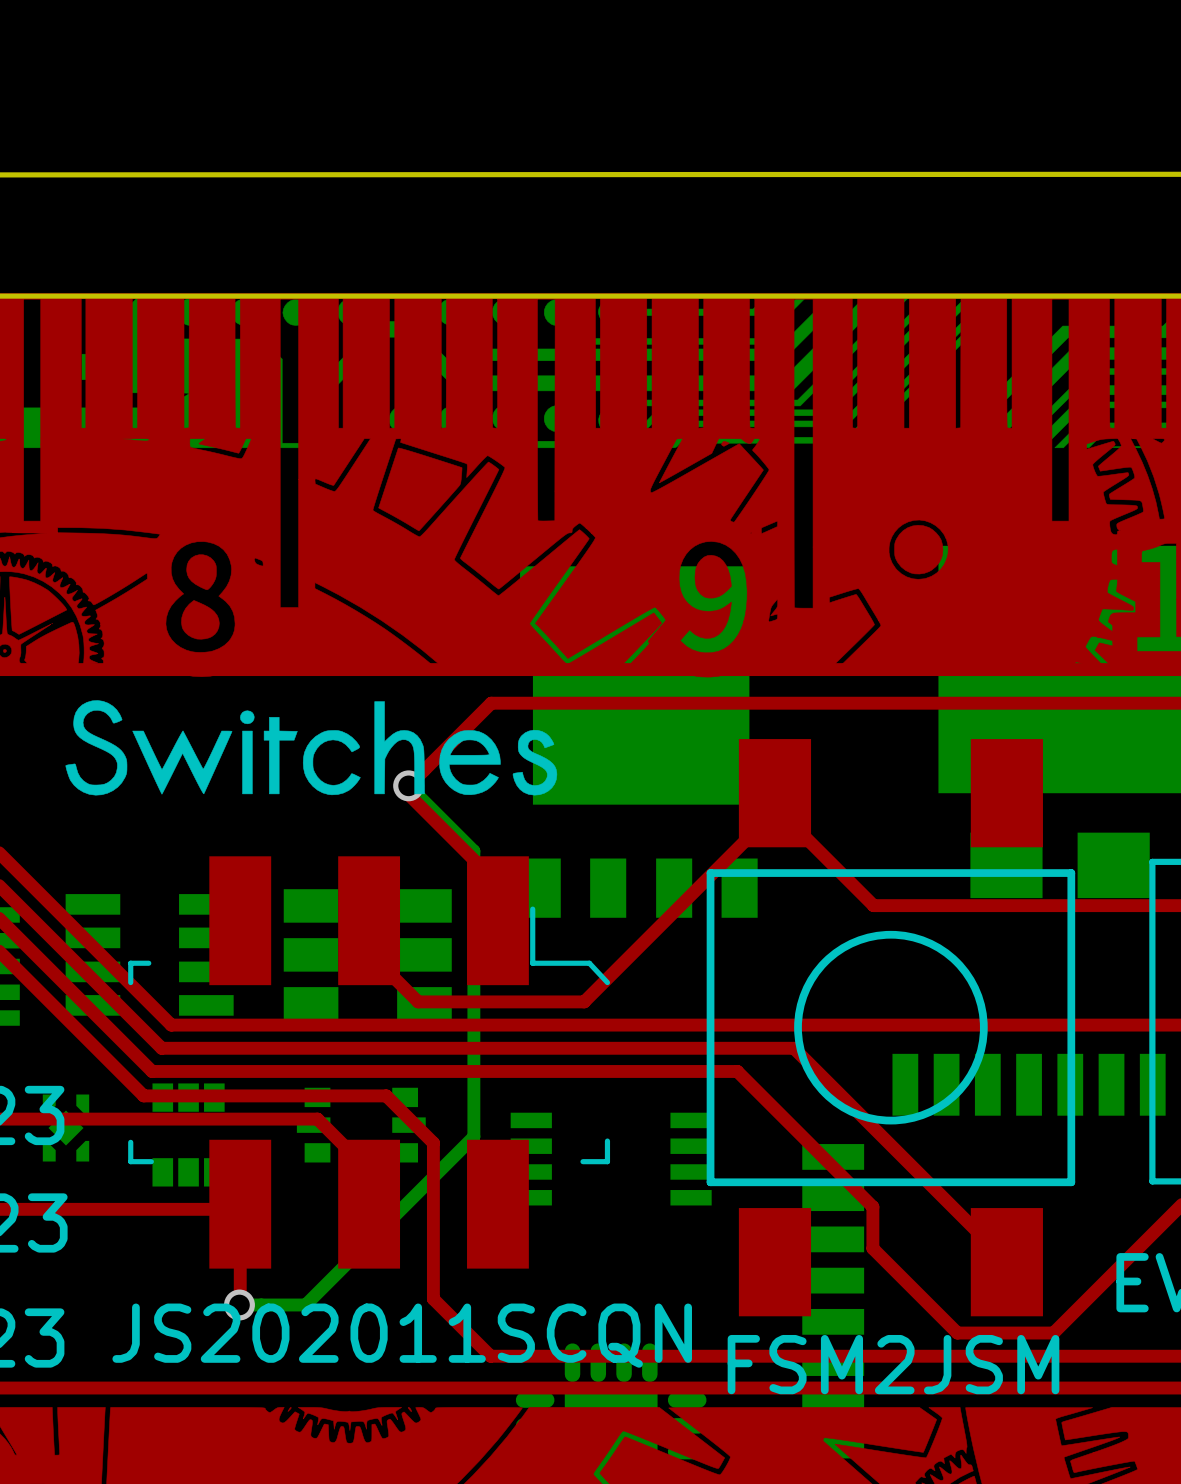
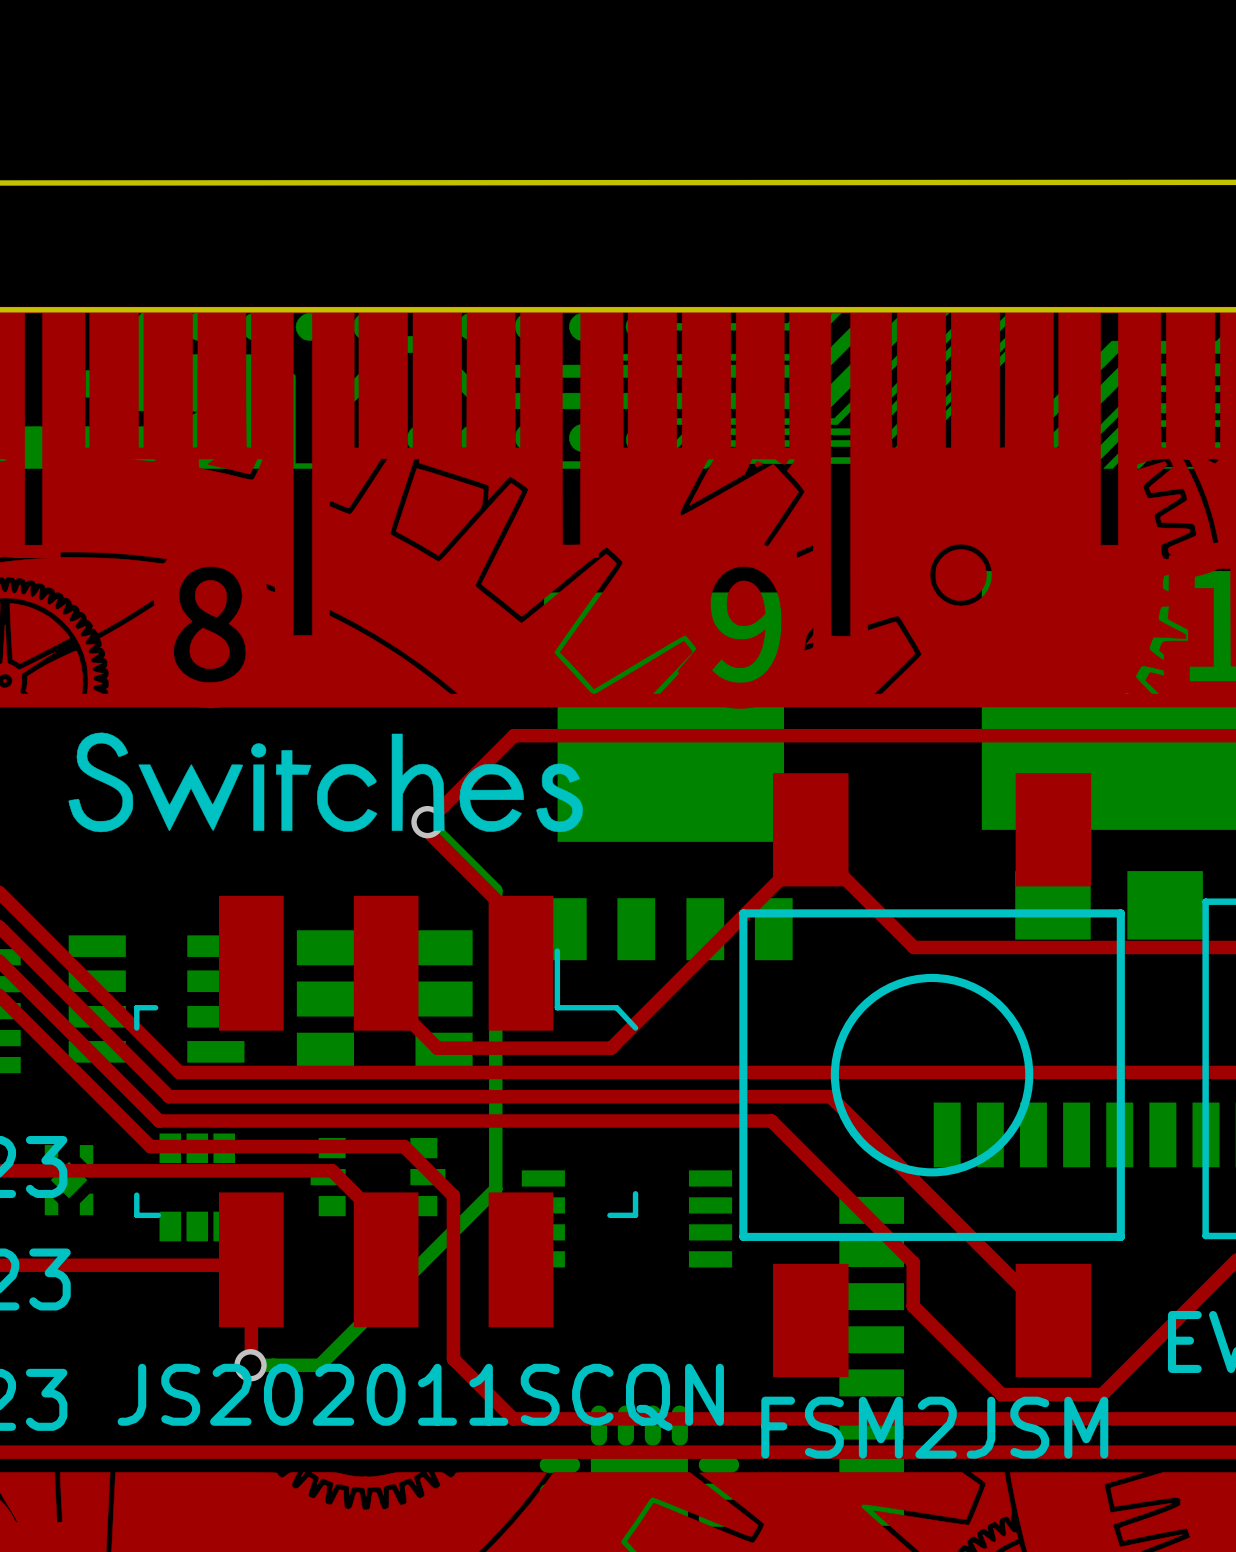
part position: (611, 1159) -> (626, 1218)

